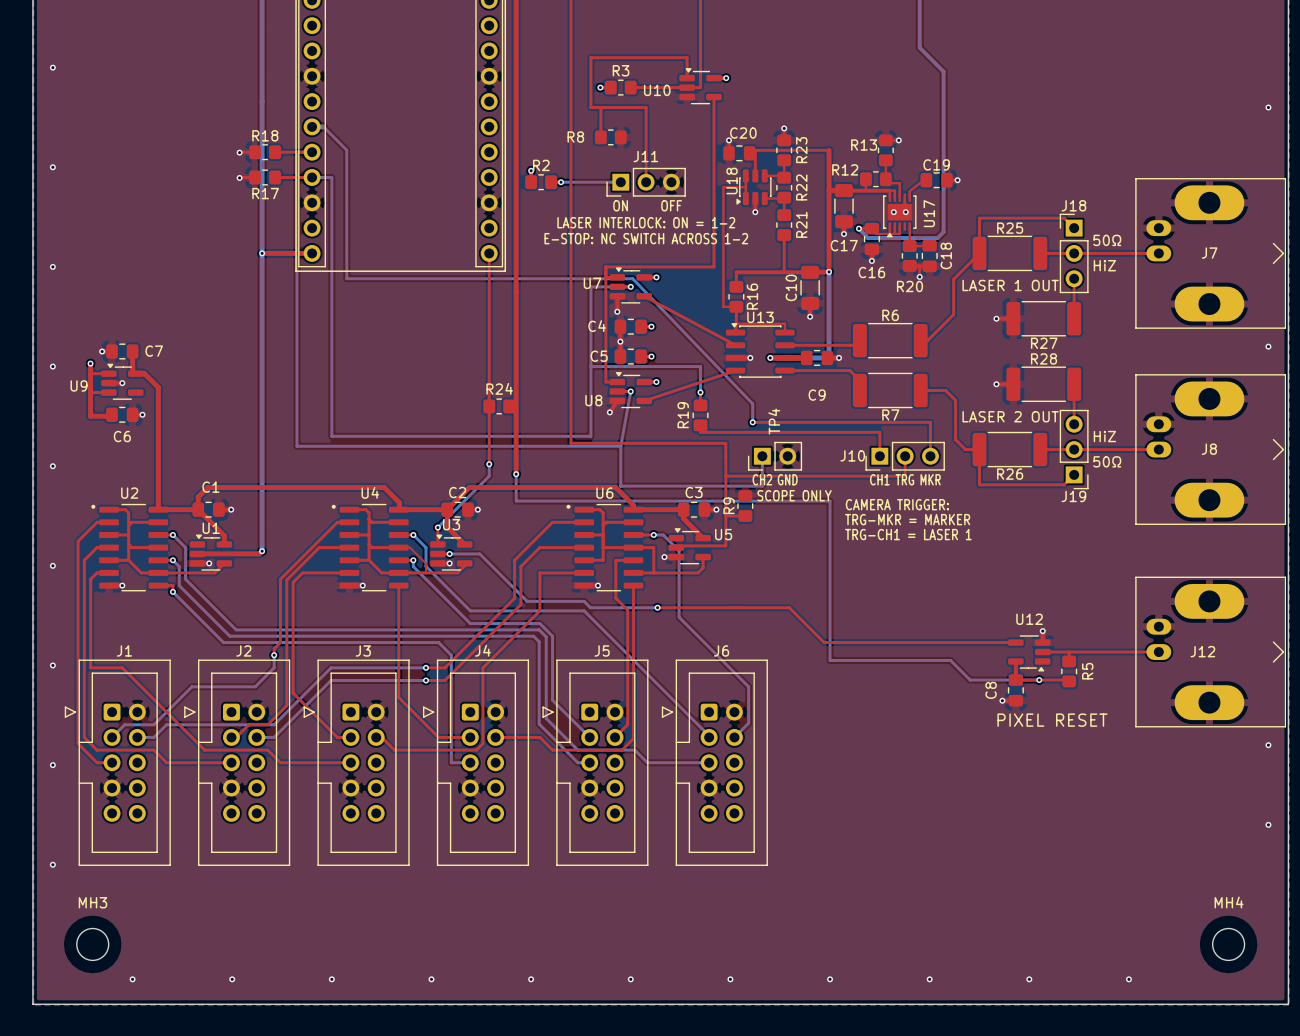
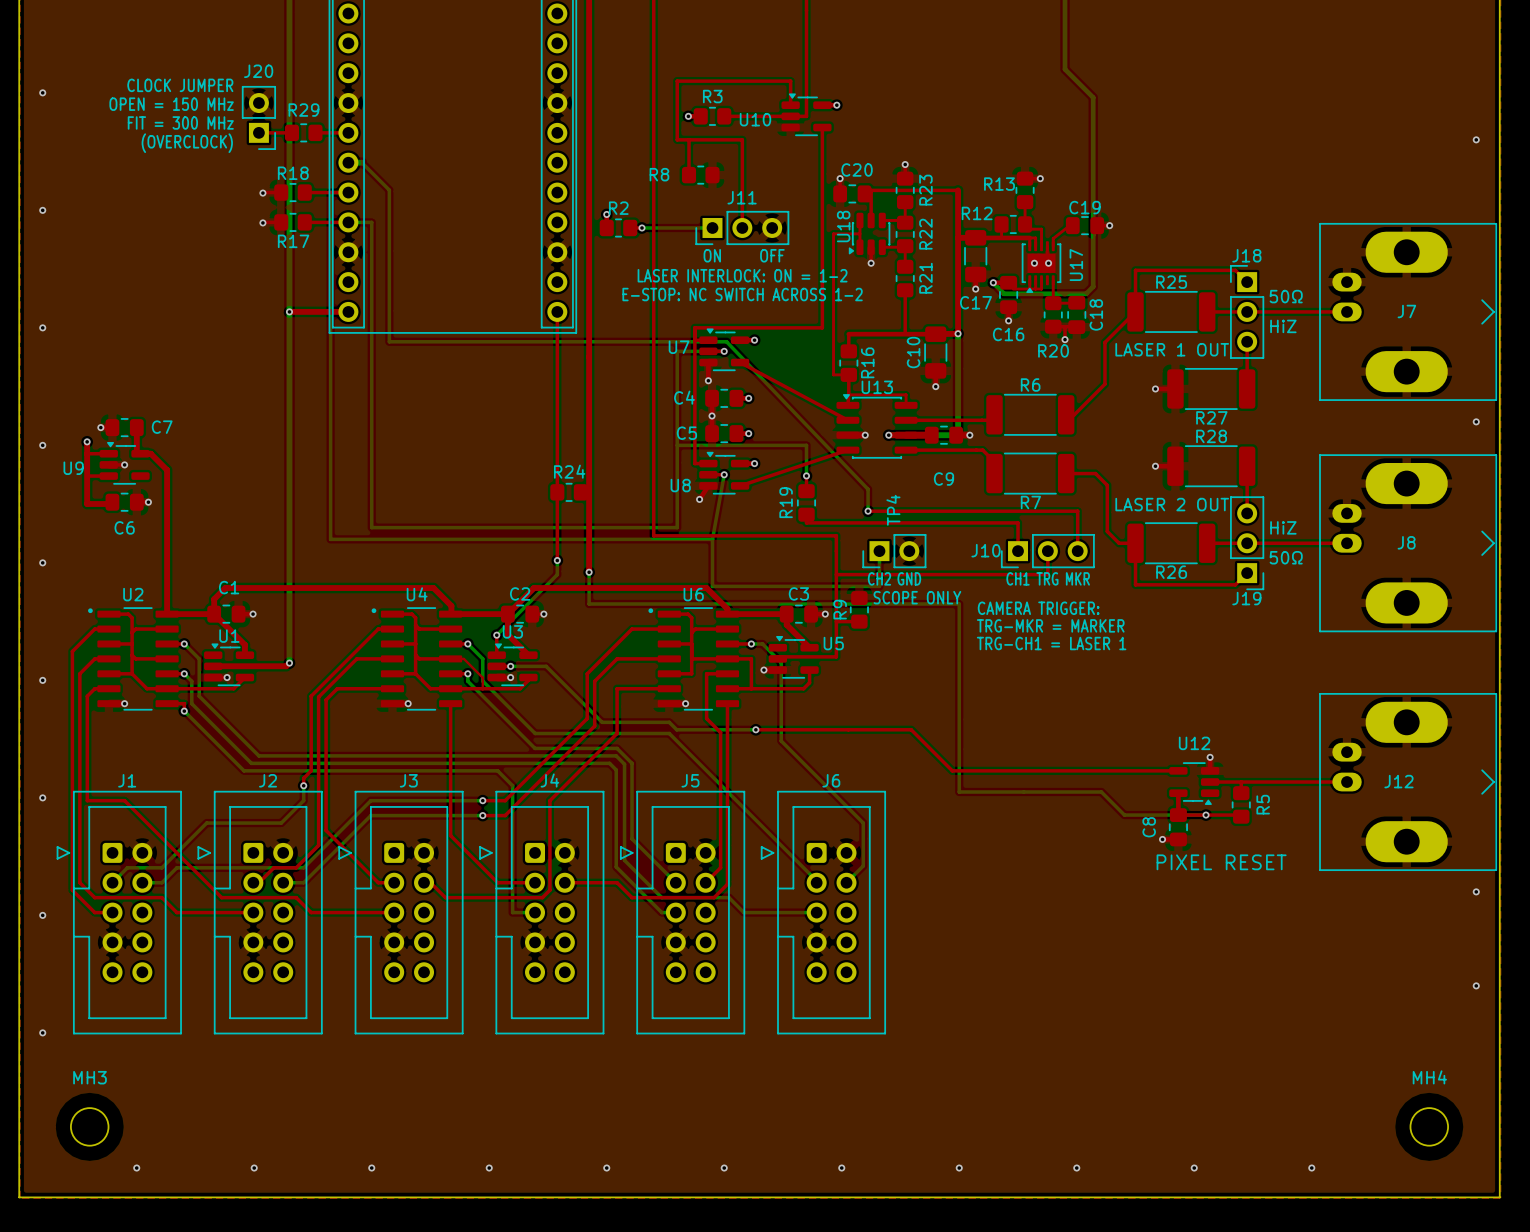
text: none -> CLOCK JUMPER (180, 85)
text: none -> OPEN = 150 MHz (171, 104)
J20: none -> (258, 117)
text: none -> FIT = 300 MHz (180, 122)
top track: none -> (258, 132) (291, 132)
R29: none -> (303, 132)
top track: none -> (315, 132) (348, 132)
text: none -> (OVERCLOCK) (187, 143)

